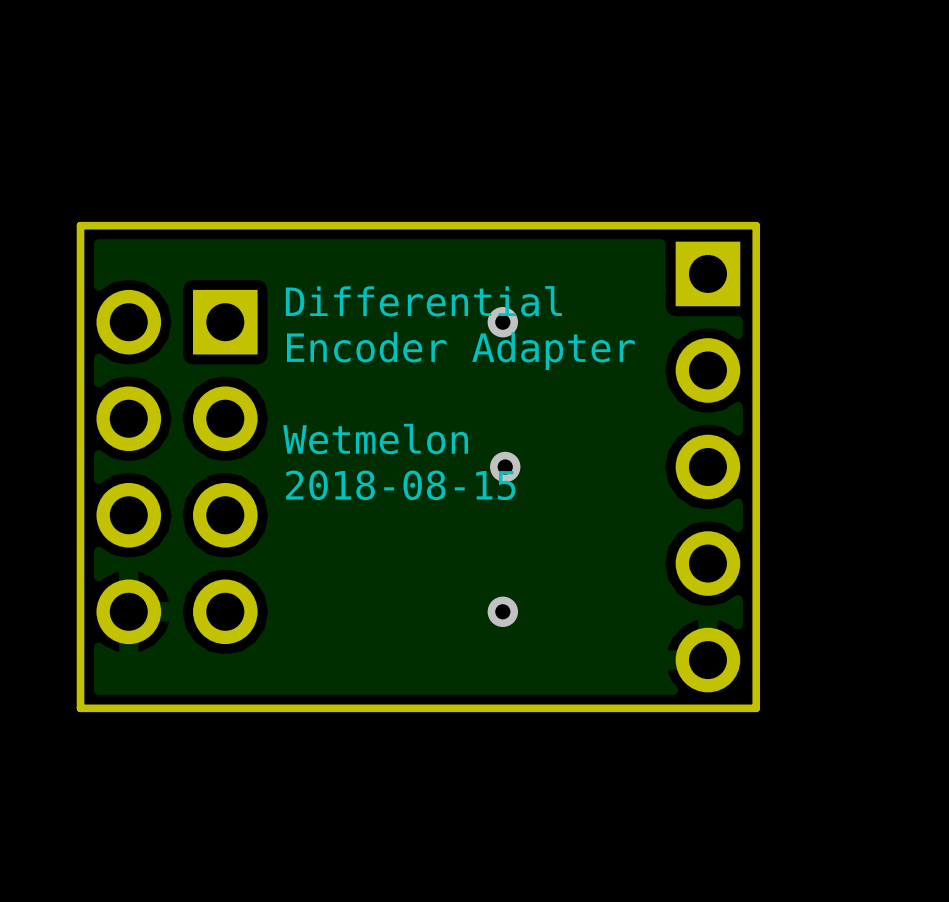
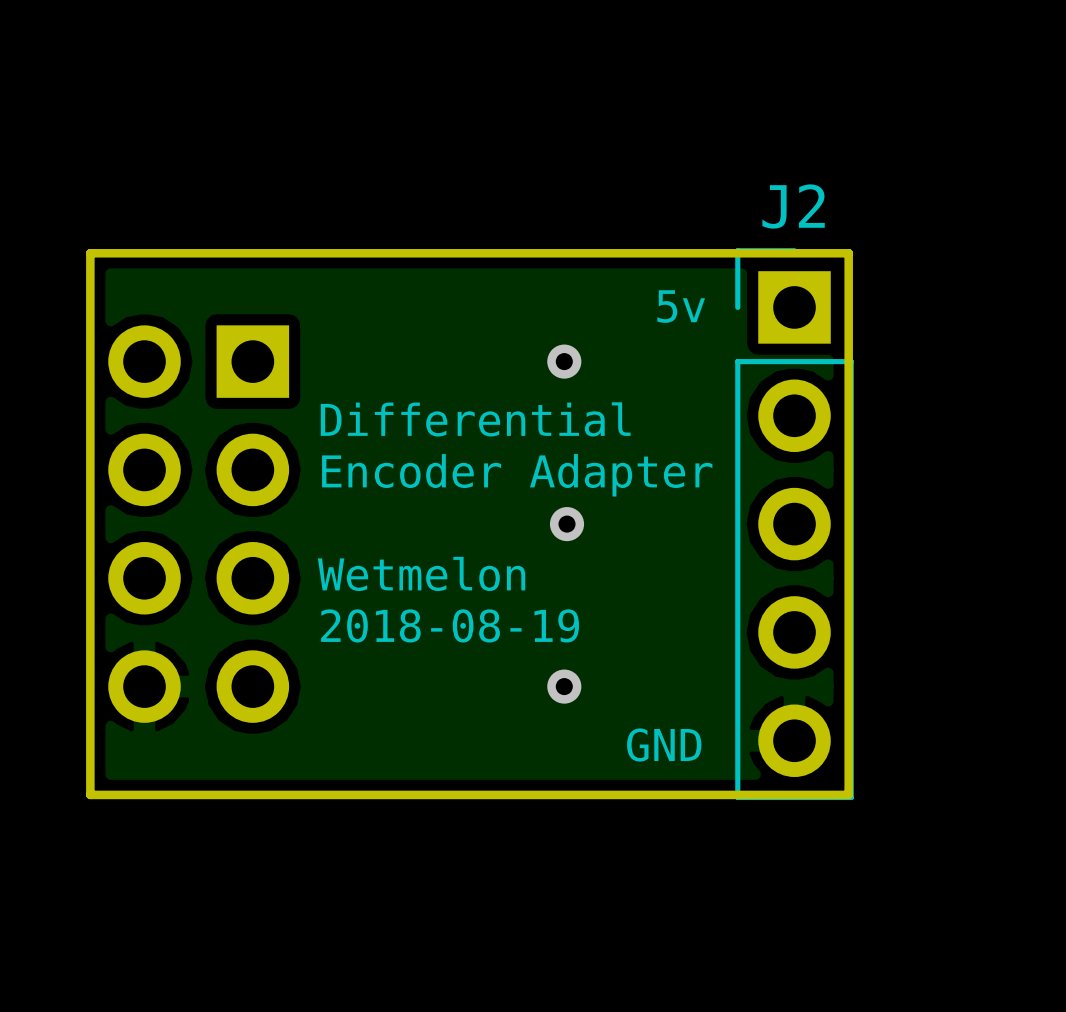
text: none -> 5v (681, 306)
text position: Differential (423, 301) -> Differential (475, 419)
text position: Encoder Adapter (460, 351) -> Encoder Adapter (517, 475)
text position: Wetmelon (375, 439) -> Wetmelon (421, 573)
J2 side: top (707, 467) -> bottom (794, 524)
text: 2018-08-15 (400, 485) -> none
text: none -> 2018-08-19 (450, 625)
text: none -> GND (664, 745)

